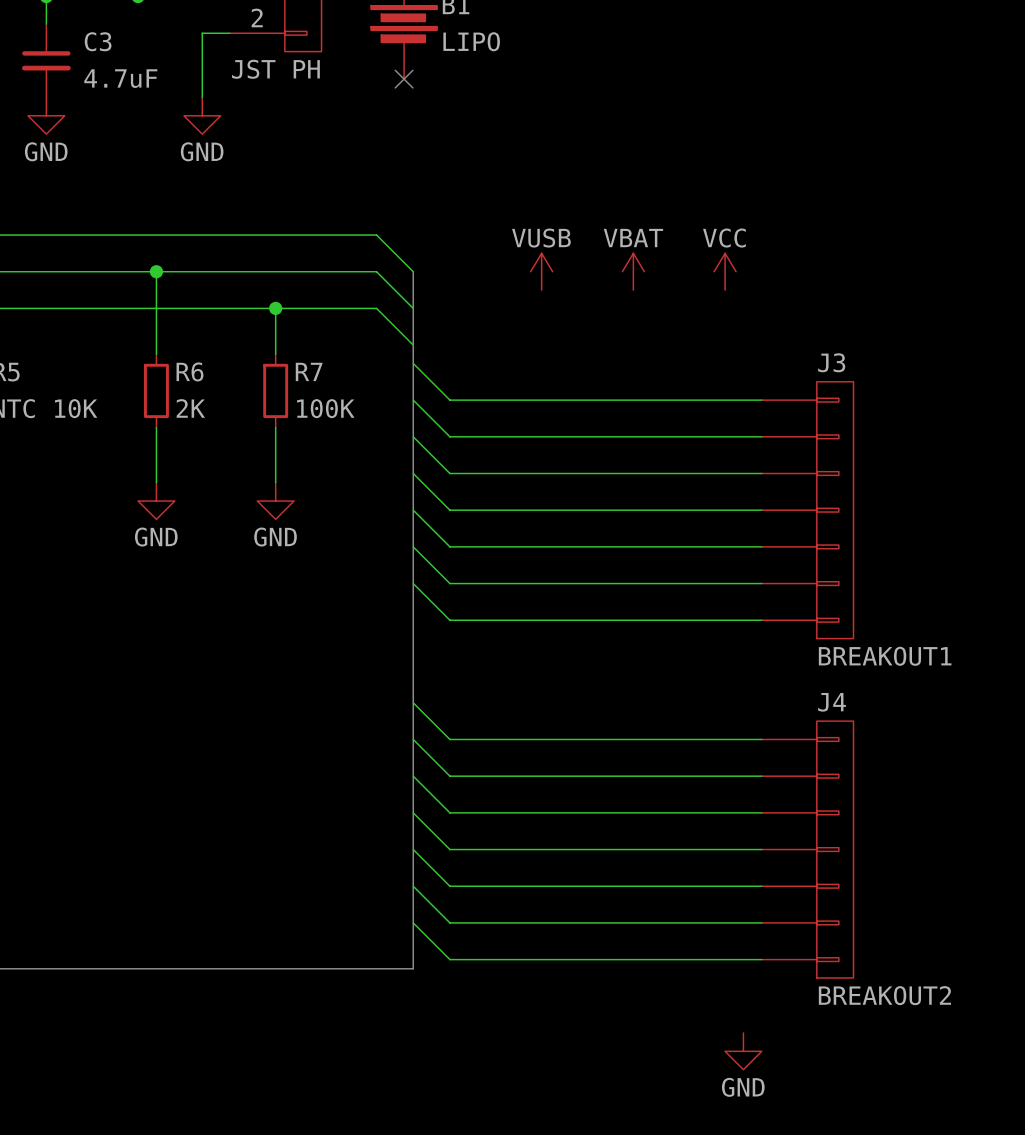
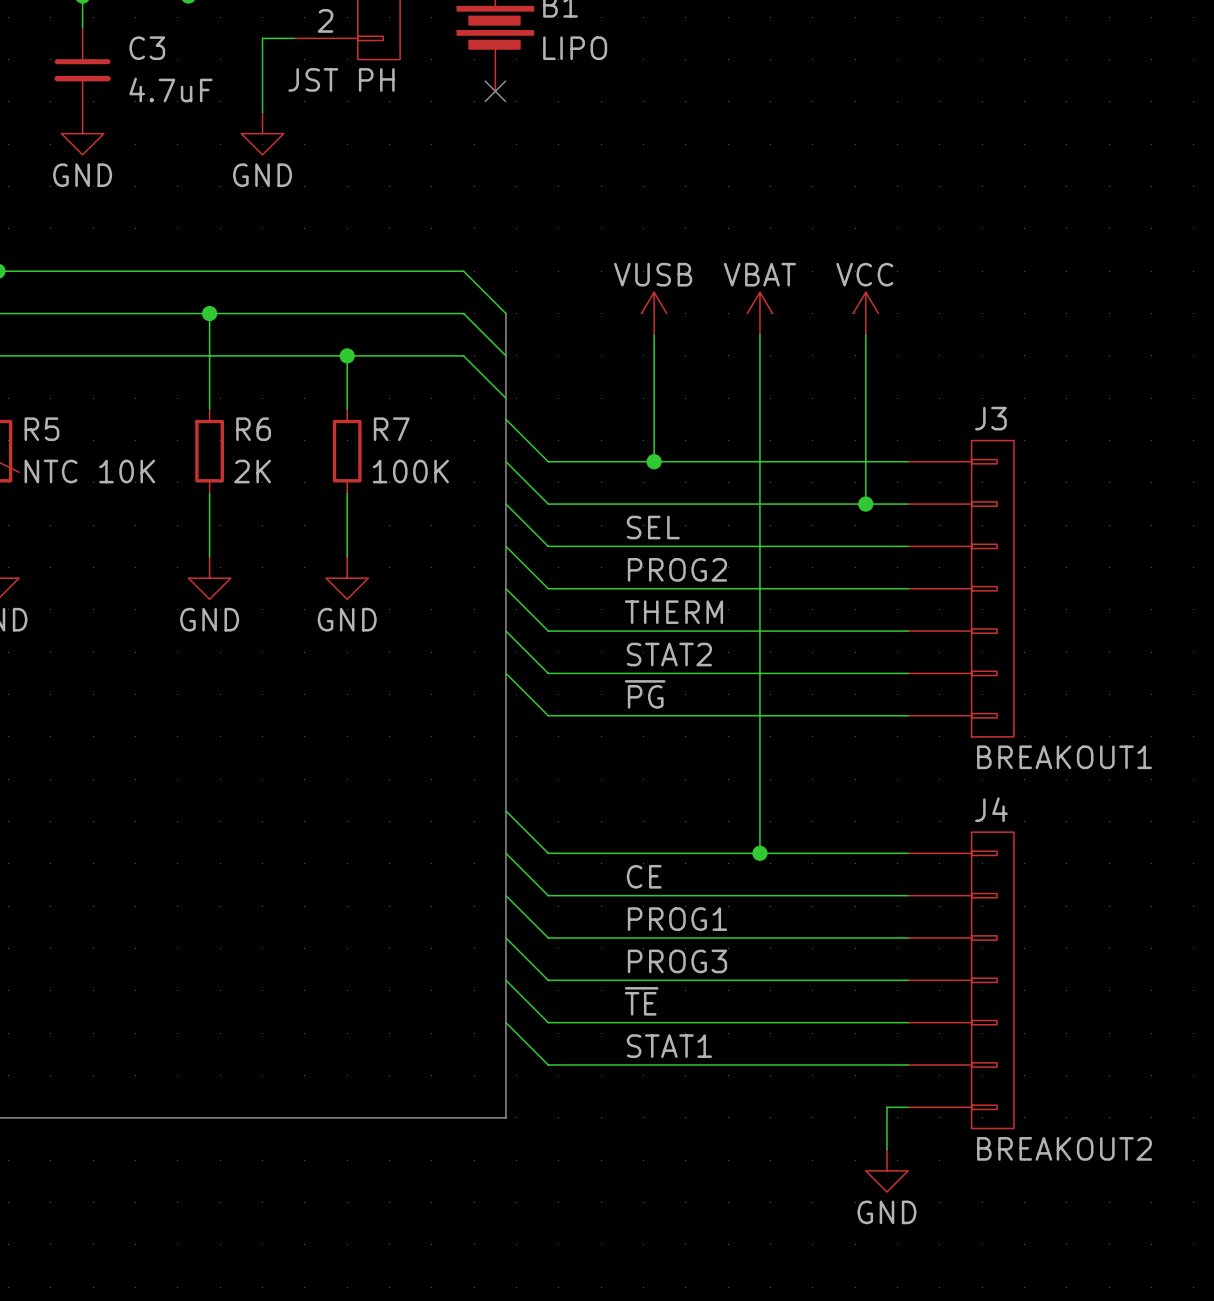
wire: none -> (654, 334) (654, 461)
wire: none -> (759, 334) (759, 853)
wire: none -> (865, 334) (865, 504)
junction: none -> (654, 461)
junction: none -> (865, 504)
label: none -> SEL (653, 527)
label: none -> PROG2 (677, 569)
label: none -> THERM (673, 612)
label: none -> STAT2 (669, 654)
label: none -> ~{PG} (645, 694)
junction: none -> (759, 853)
label: none -> CE (644, 876)
label: none -> PROG1 (677, 919)
label: none -> PROG3 (677, 961)
label: none -> ~{TE} (641, 1001)
label: none -> STAT1 (669, 1046)
wire: (413, 922) (449, 959) (743, 959) -> (886, 1149) (886, 1107)
power symbol position: GND (743, 1051) -> GND (886, 1170)

